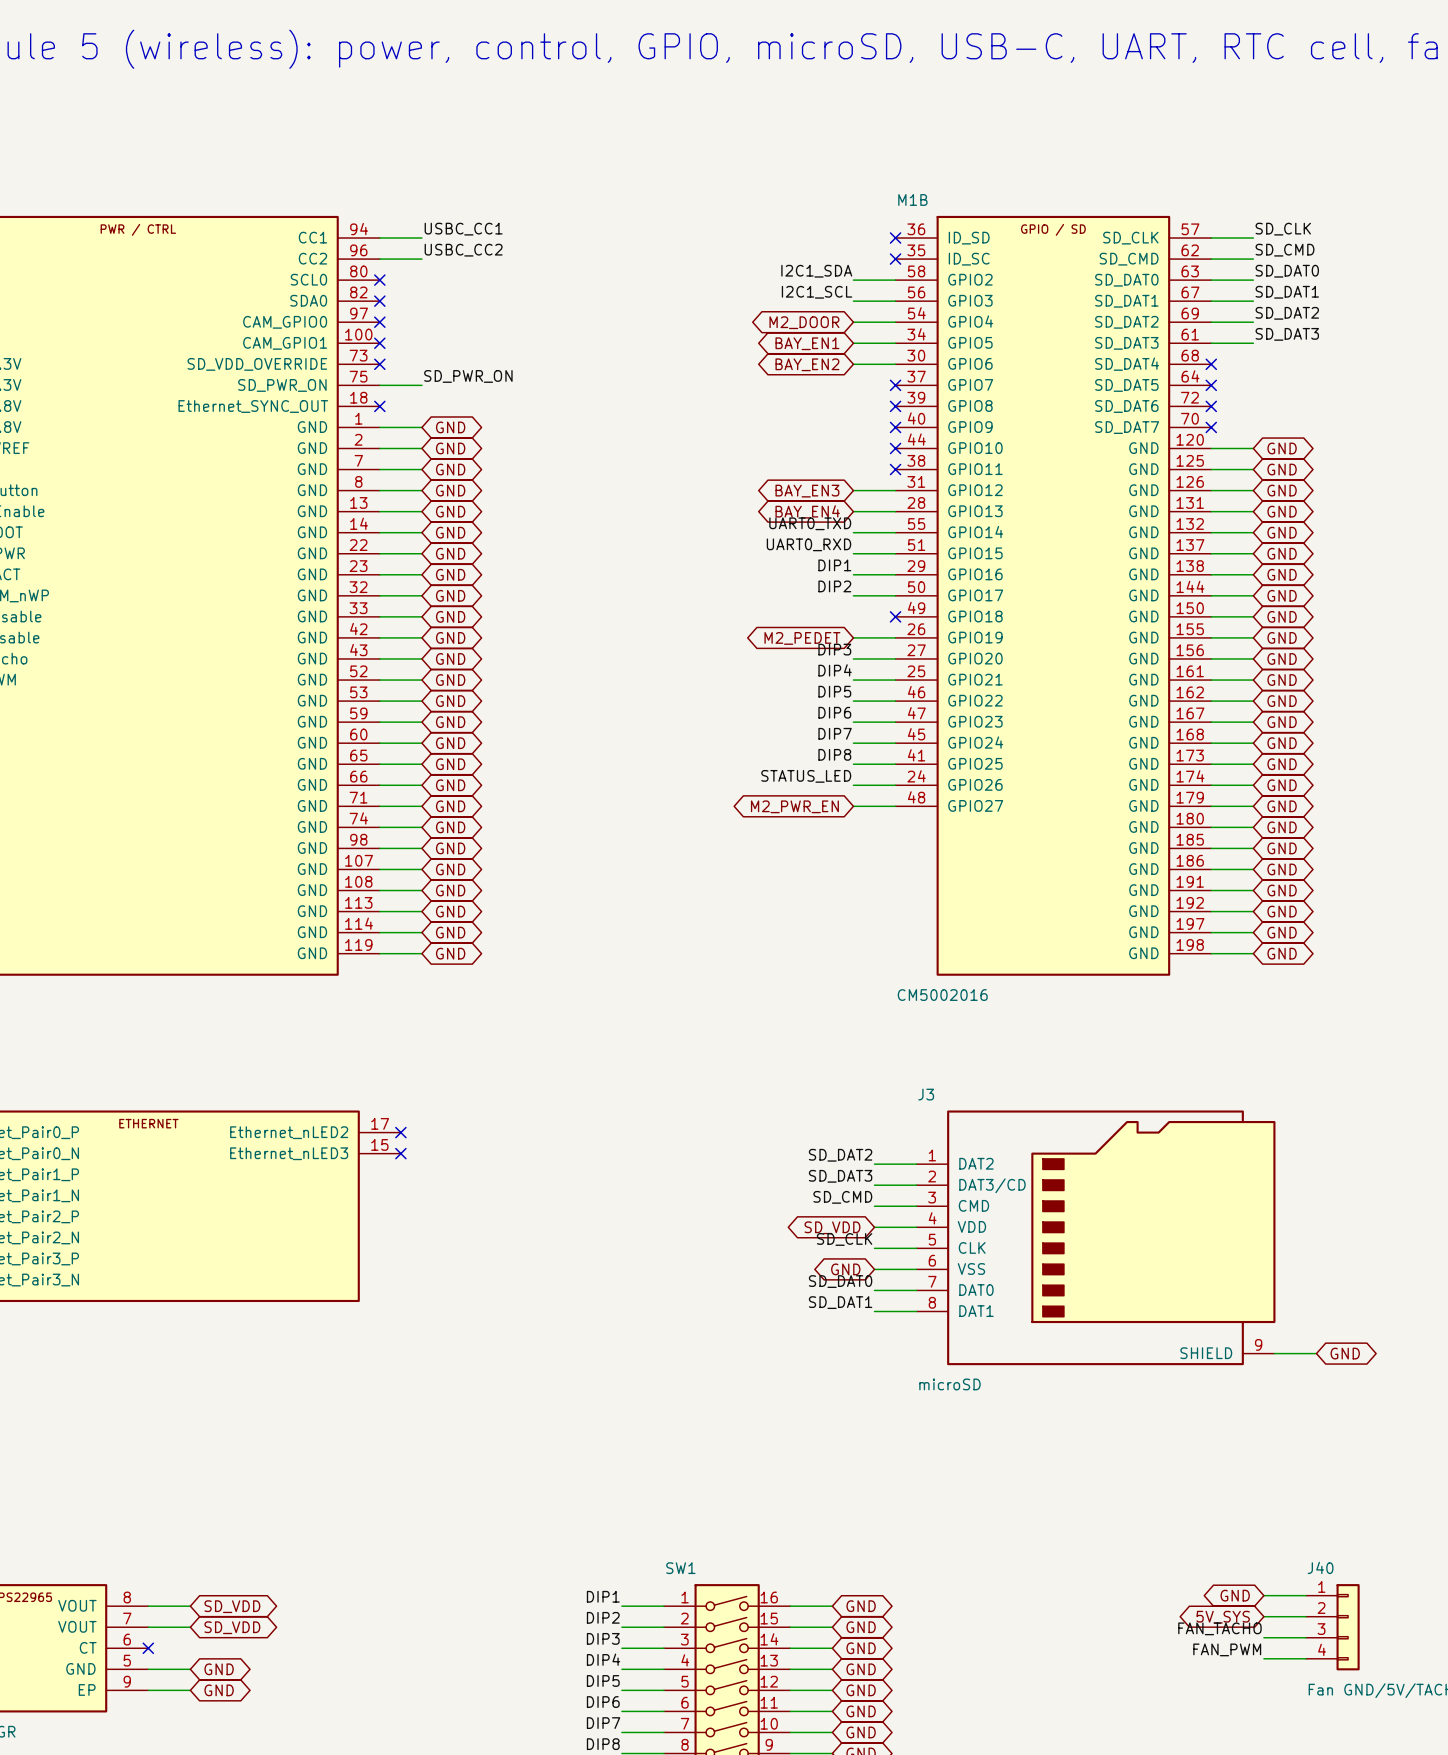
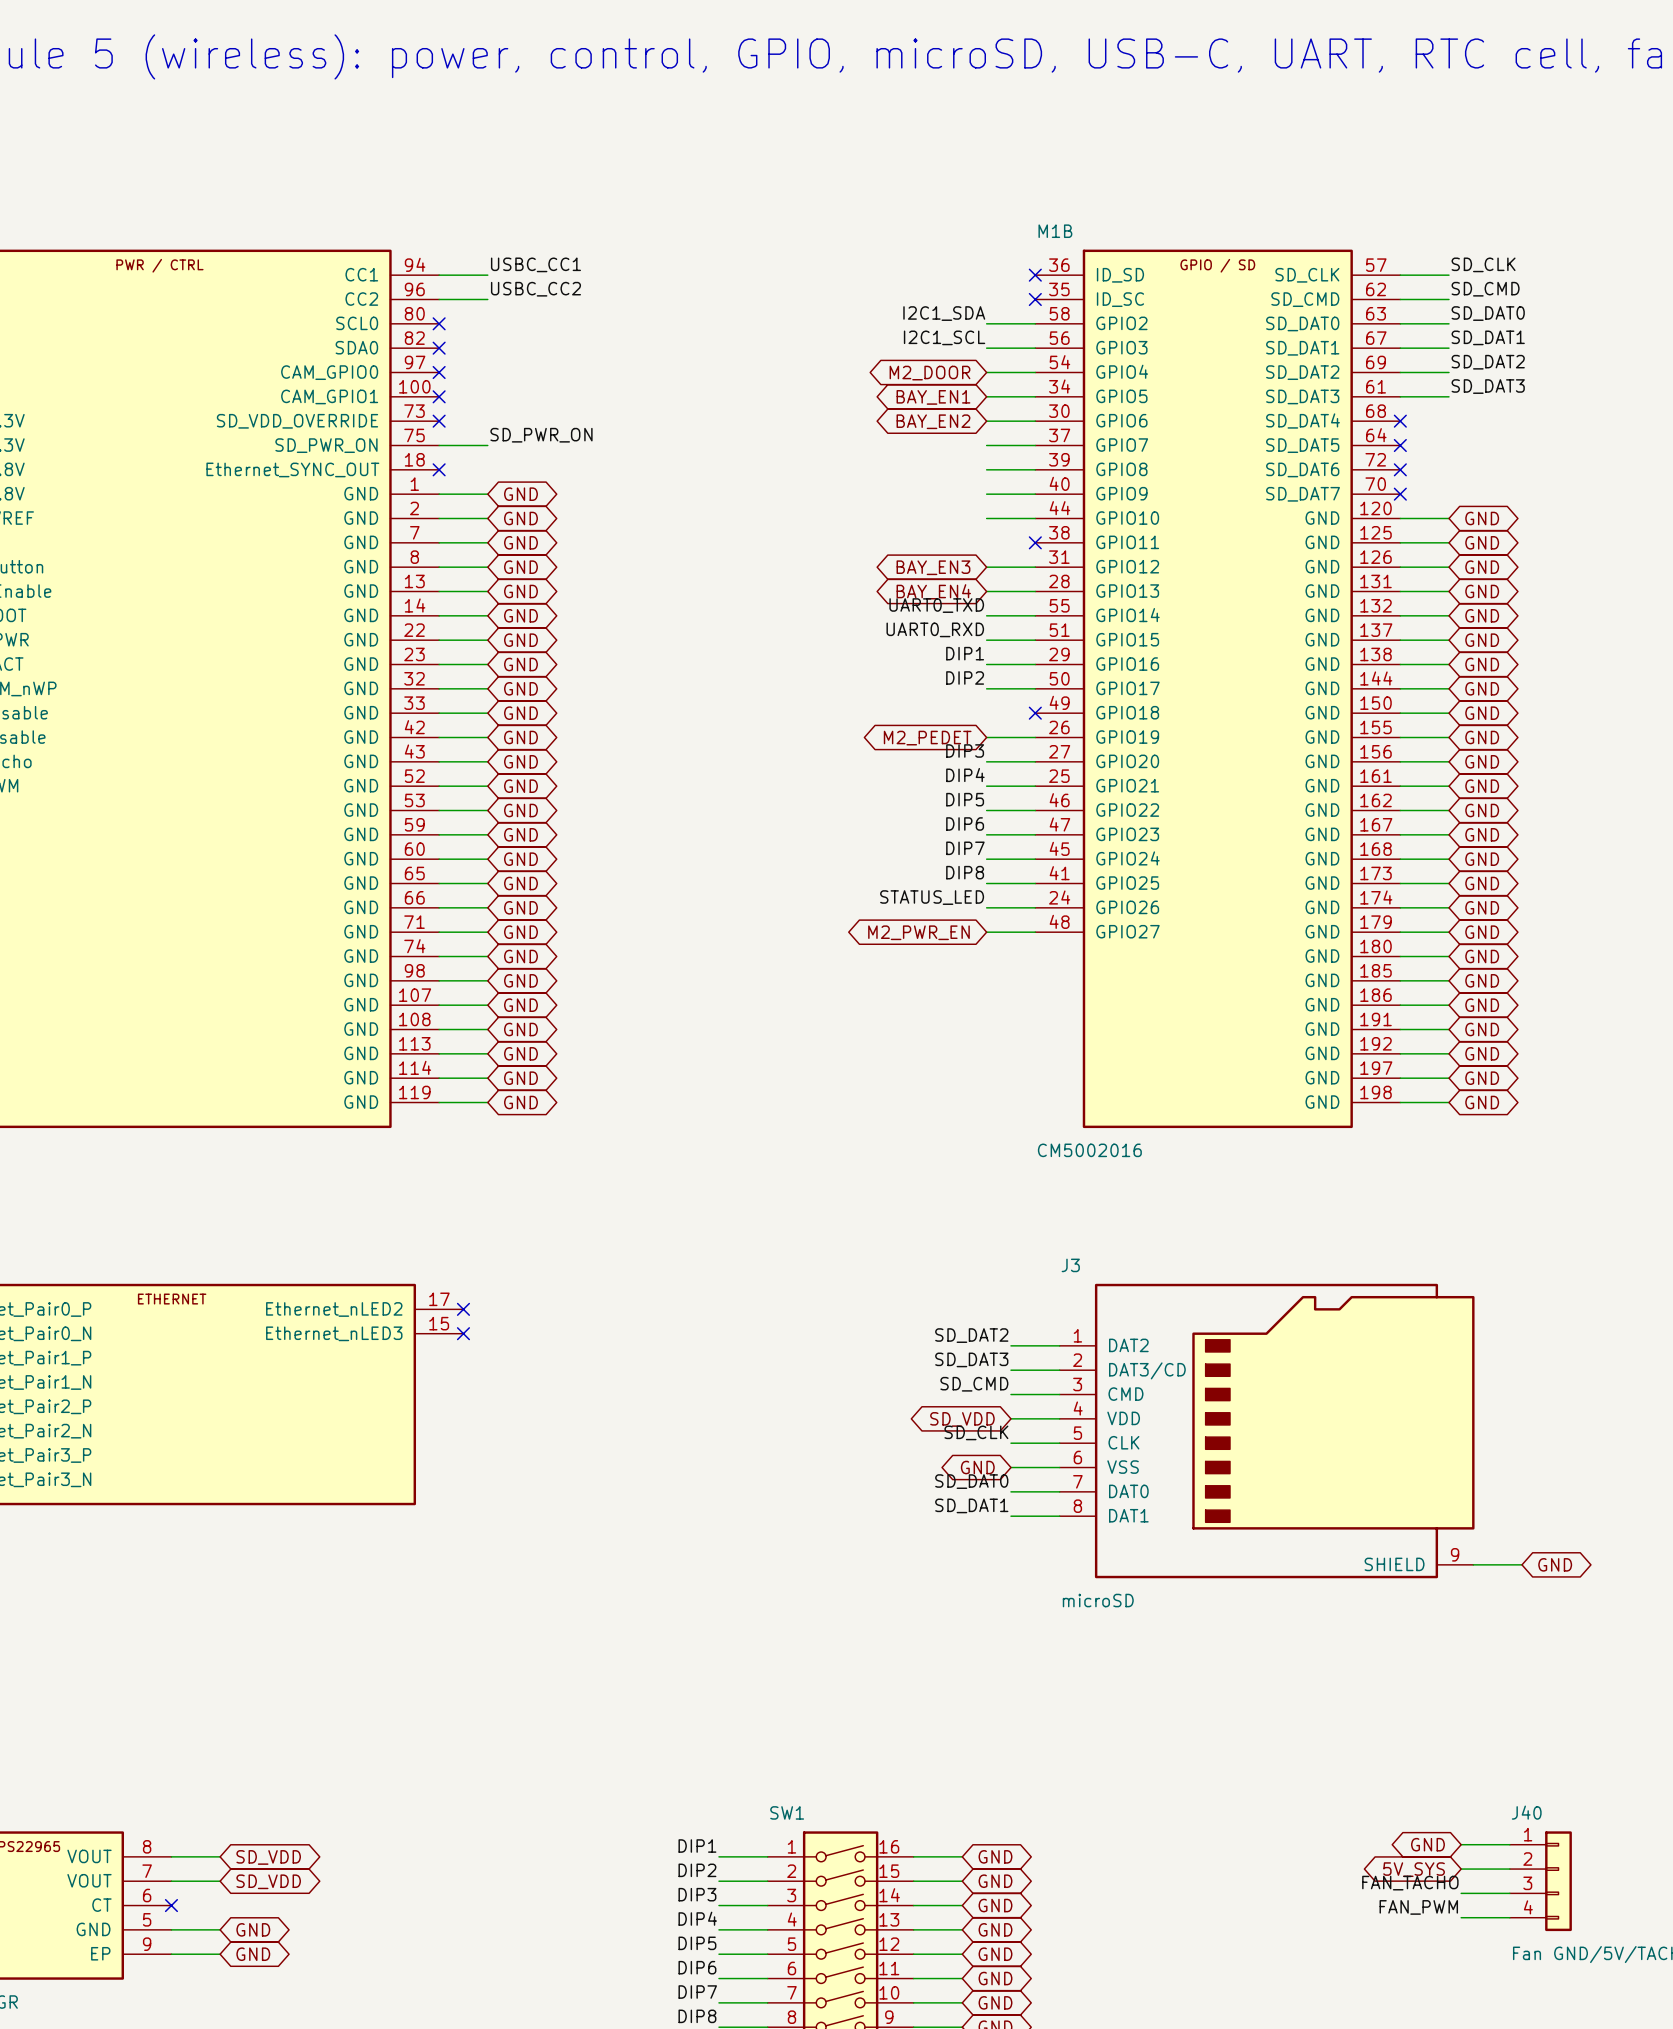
wire: none -> (986, 445) (1035, 445)
no-connect mark: (895, 385) -> none
wire: none -> (986, 469) (1035, 469)
no-connect mark: (895, 406) -> none
wire: none -> (986, 494) (1035, 494)
no-connect mark: (895, 427) -> none
wire: none -> (986, 518) (1035, 518)
no-connect mark: (895, 448) -> none

